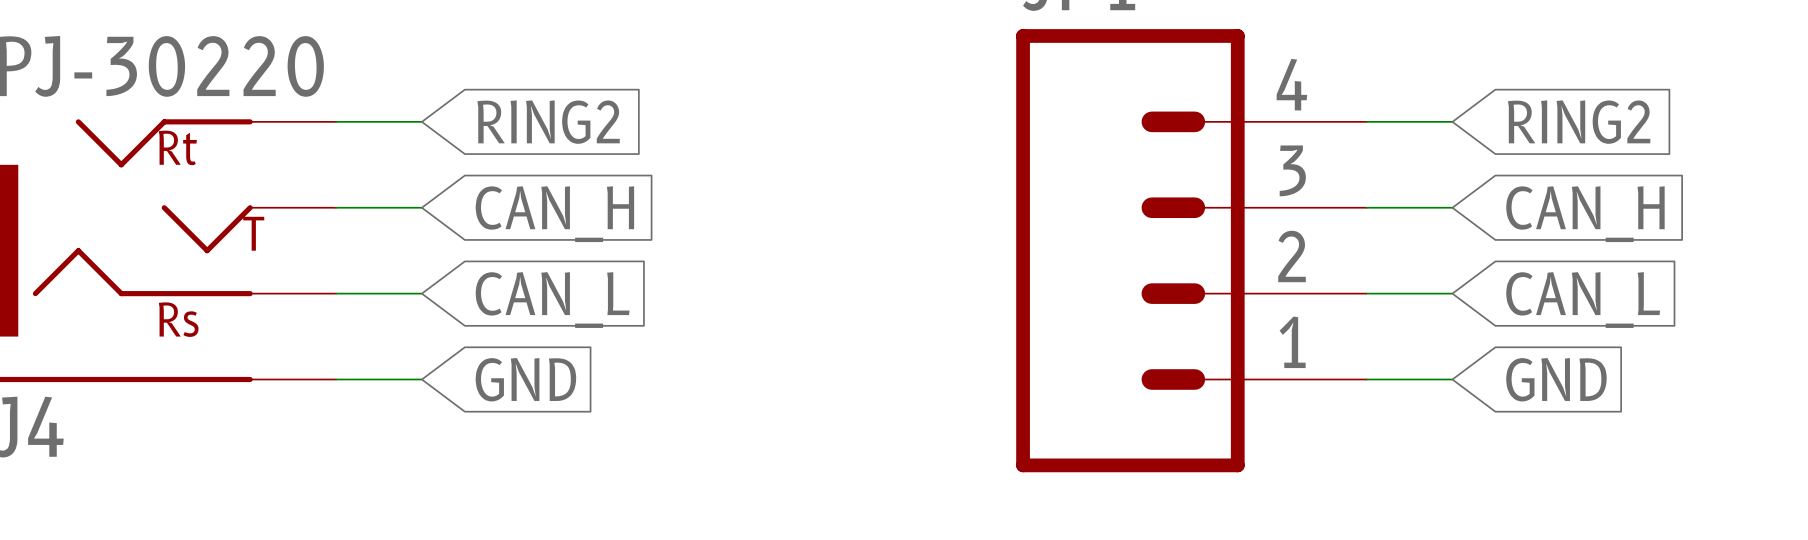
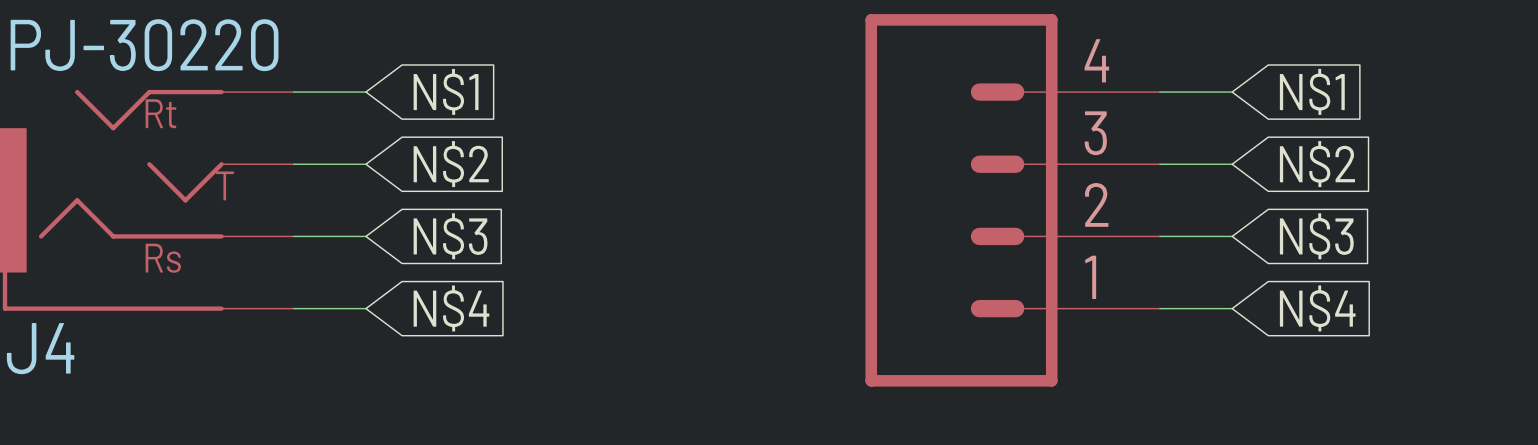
global label: RING2 (548, 122) -> N$1 (446, 91)
global label: RING2 (1579, 122) -> N$1 (1312, 91)
global label: CAN_H (554, 214) -> N$2 (451, 164)
global label: CAN_H (1585, 214) -> N$2 (1317, 164)
global label: CAN_L (552, 300) -> N$3 (450, 236)
global label: CAN_L (1583, 300) -> N$3 (1316, 236)
global label: GND (525, 379) -> N$4 (451, 308)
global label: GND (1556, 379) -> N$4 (1317, 308)

